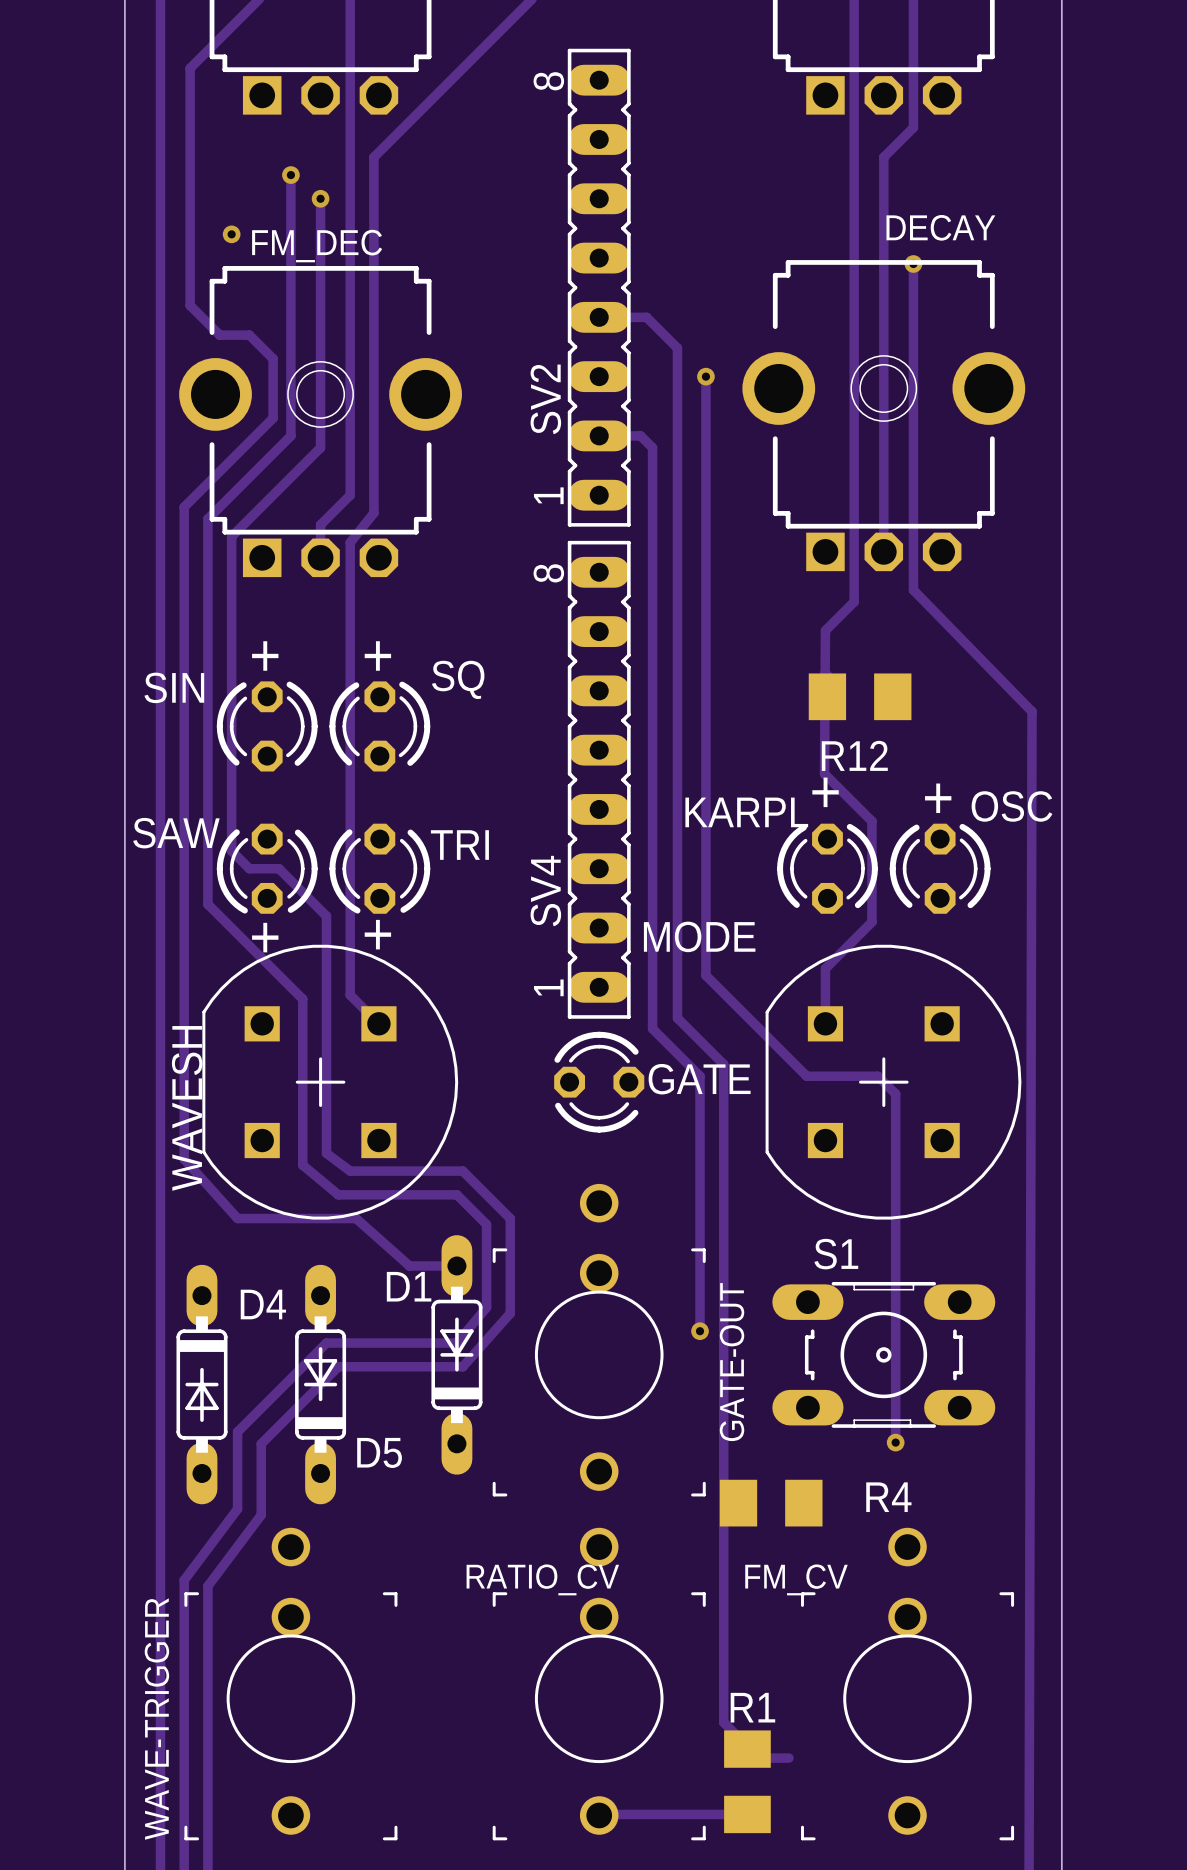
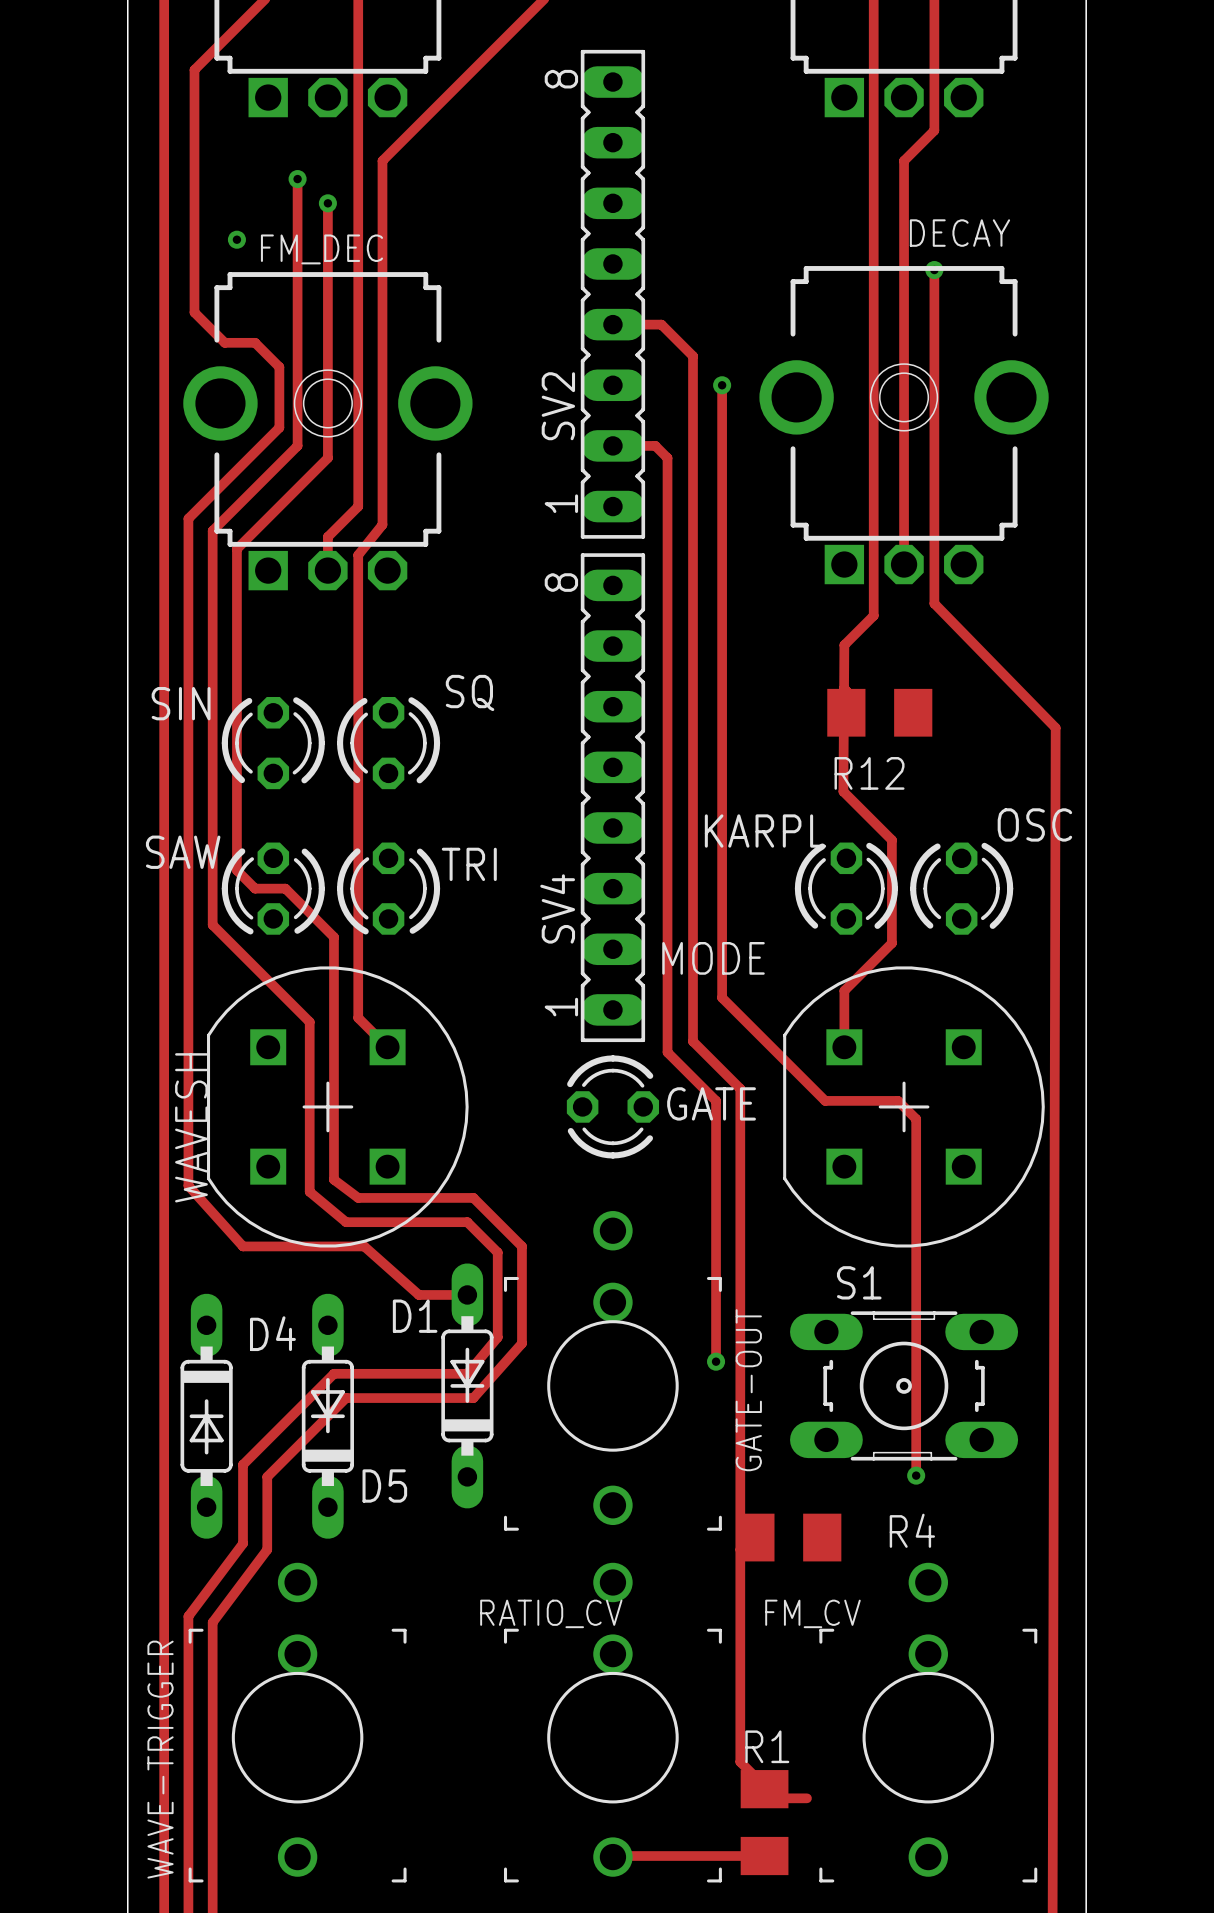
text: + (265, 655) -> none
text: + (377, 655) -> none
text: + (825, 792) -> none
text: + (938, 798) -> none
text: + (377, 934) -> none
text: + (265, 937) -> none

